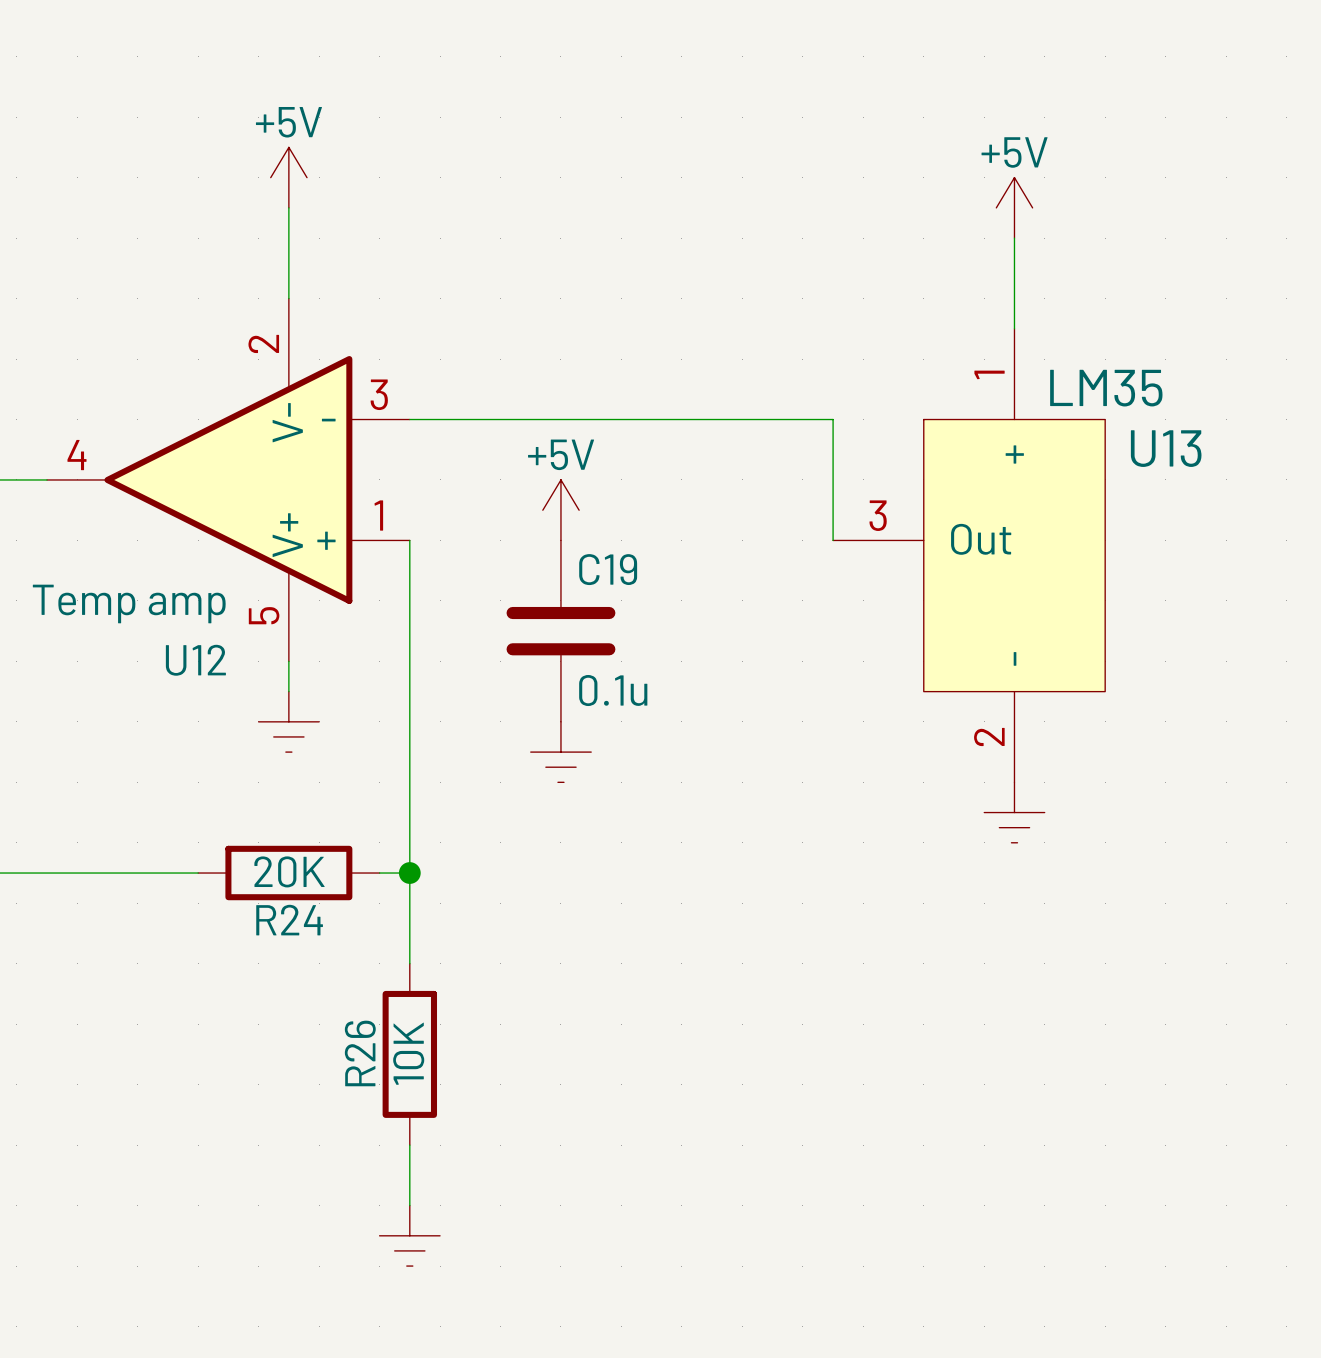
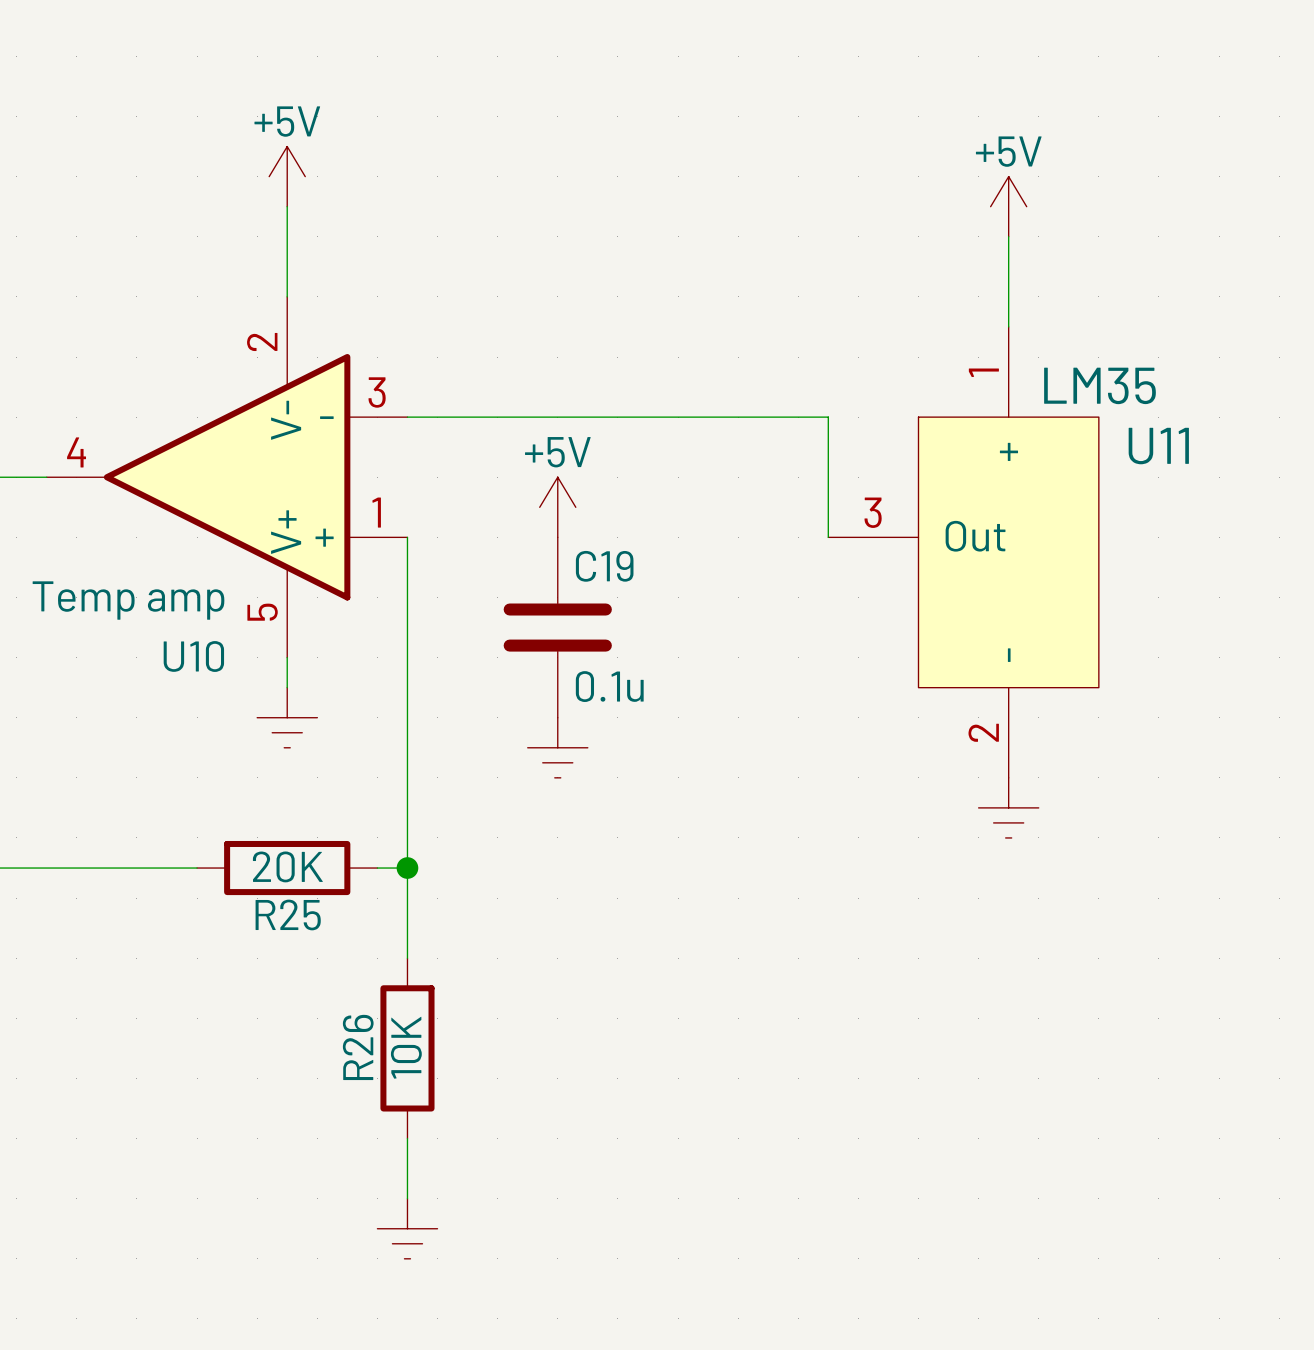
U13 name: U13 (1166, 448) -> U11 (1158, 446)
U12 name: U12 (195, 660) -> U10 (193, 656)
R24 name: R24 (289, 920) -> R25 (288, 914)

